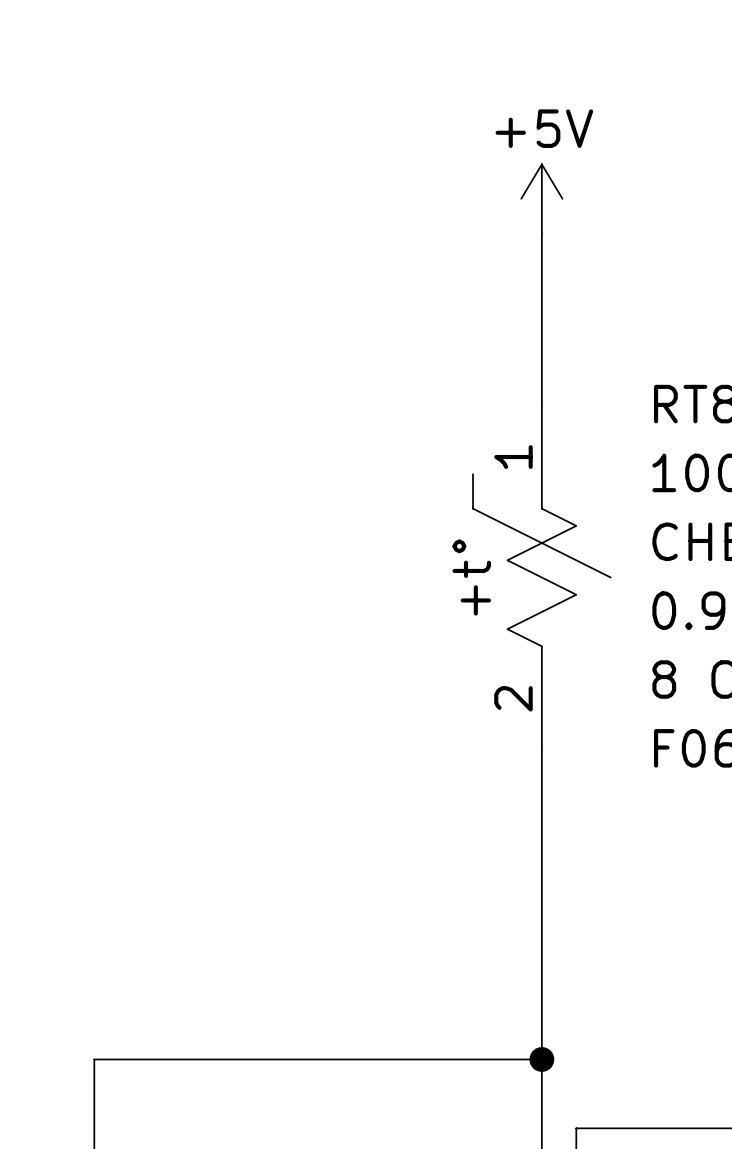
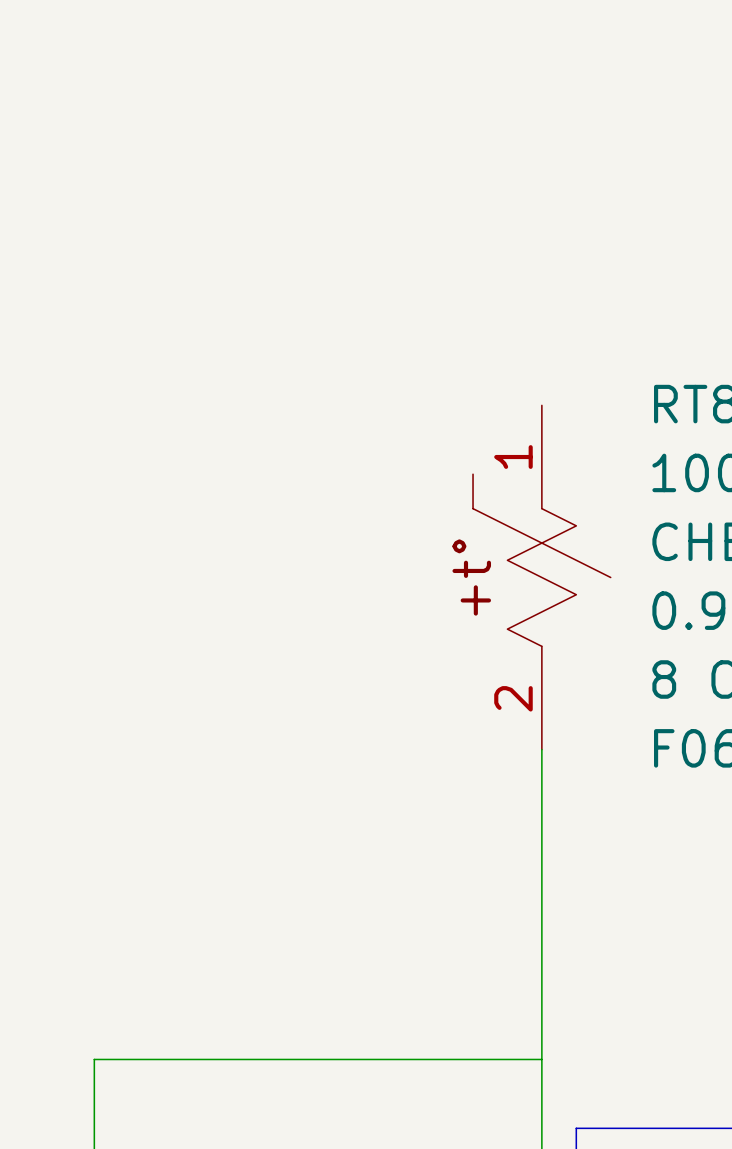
power symbol: +5V (541, 198) -> none
wire: (541, 233) (541, 405) -> none
junction: (541, 1059) -> none

